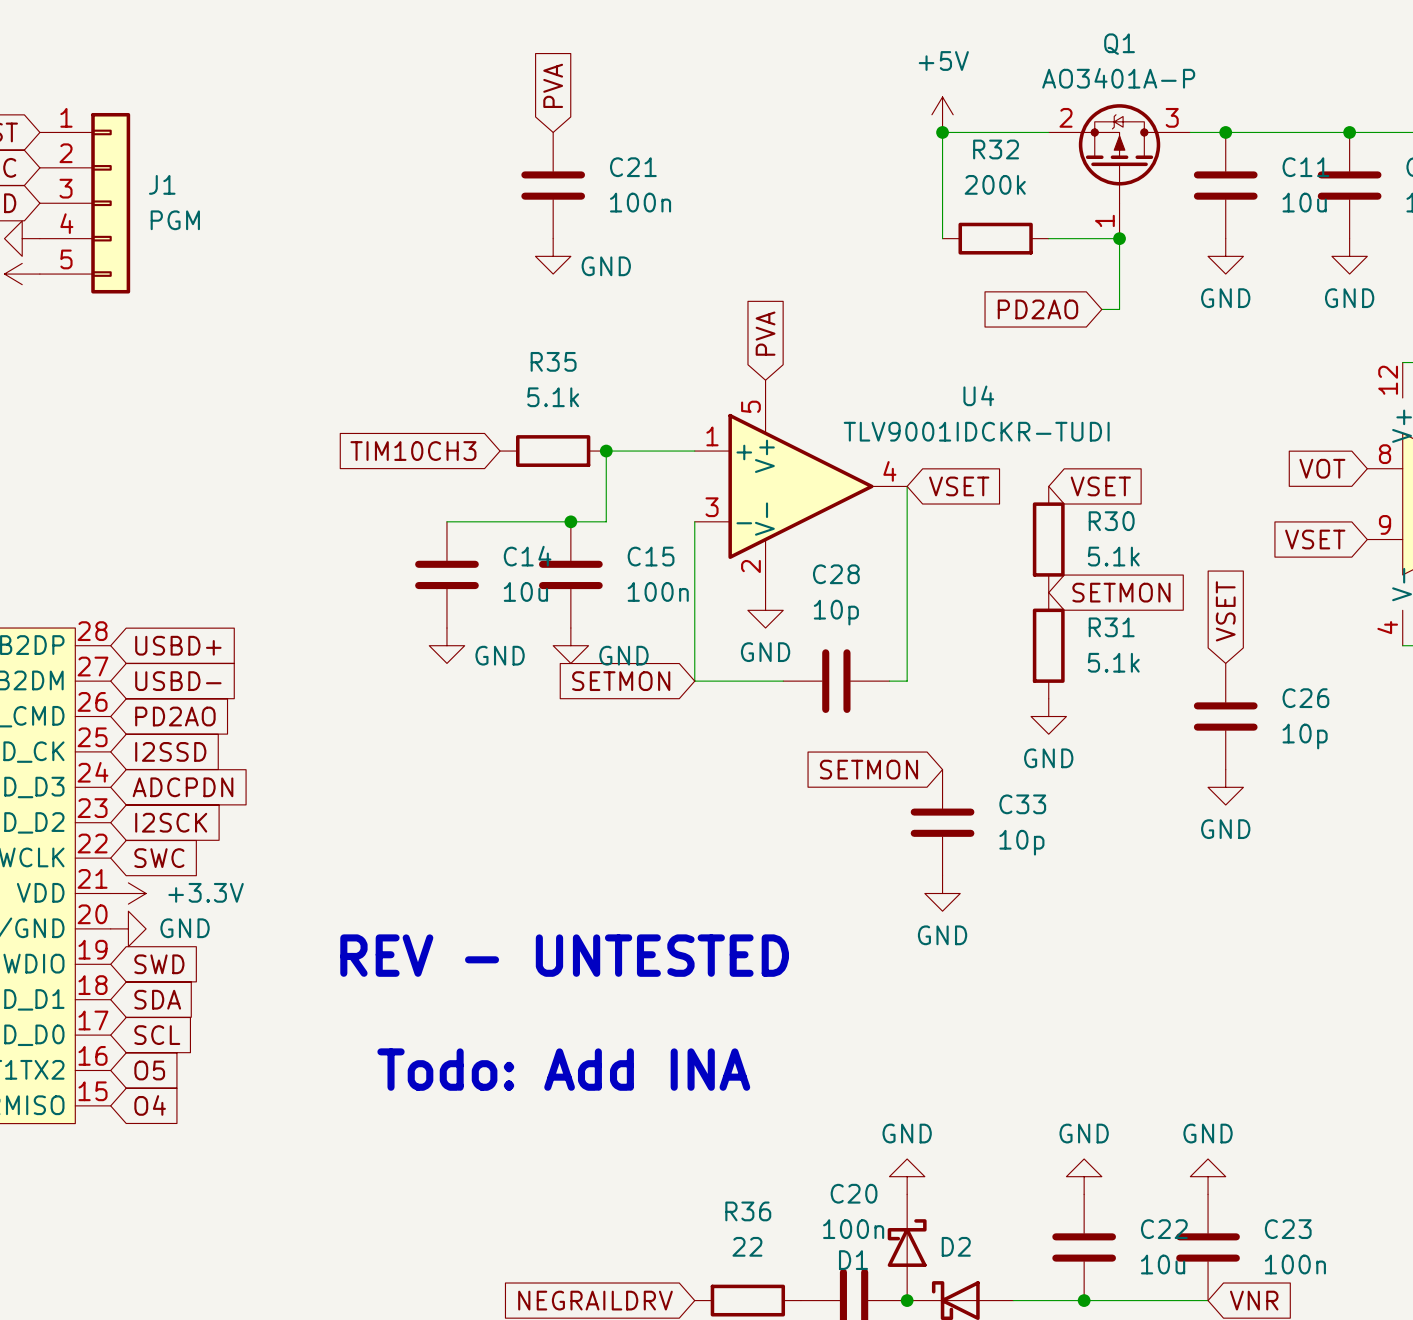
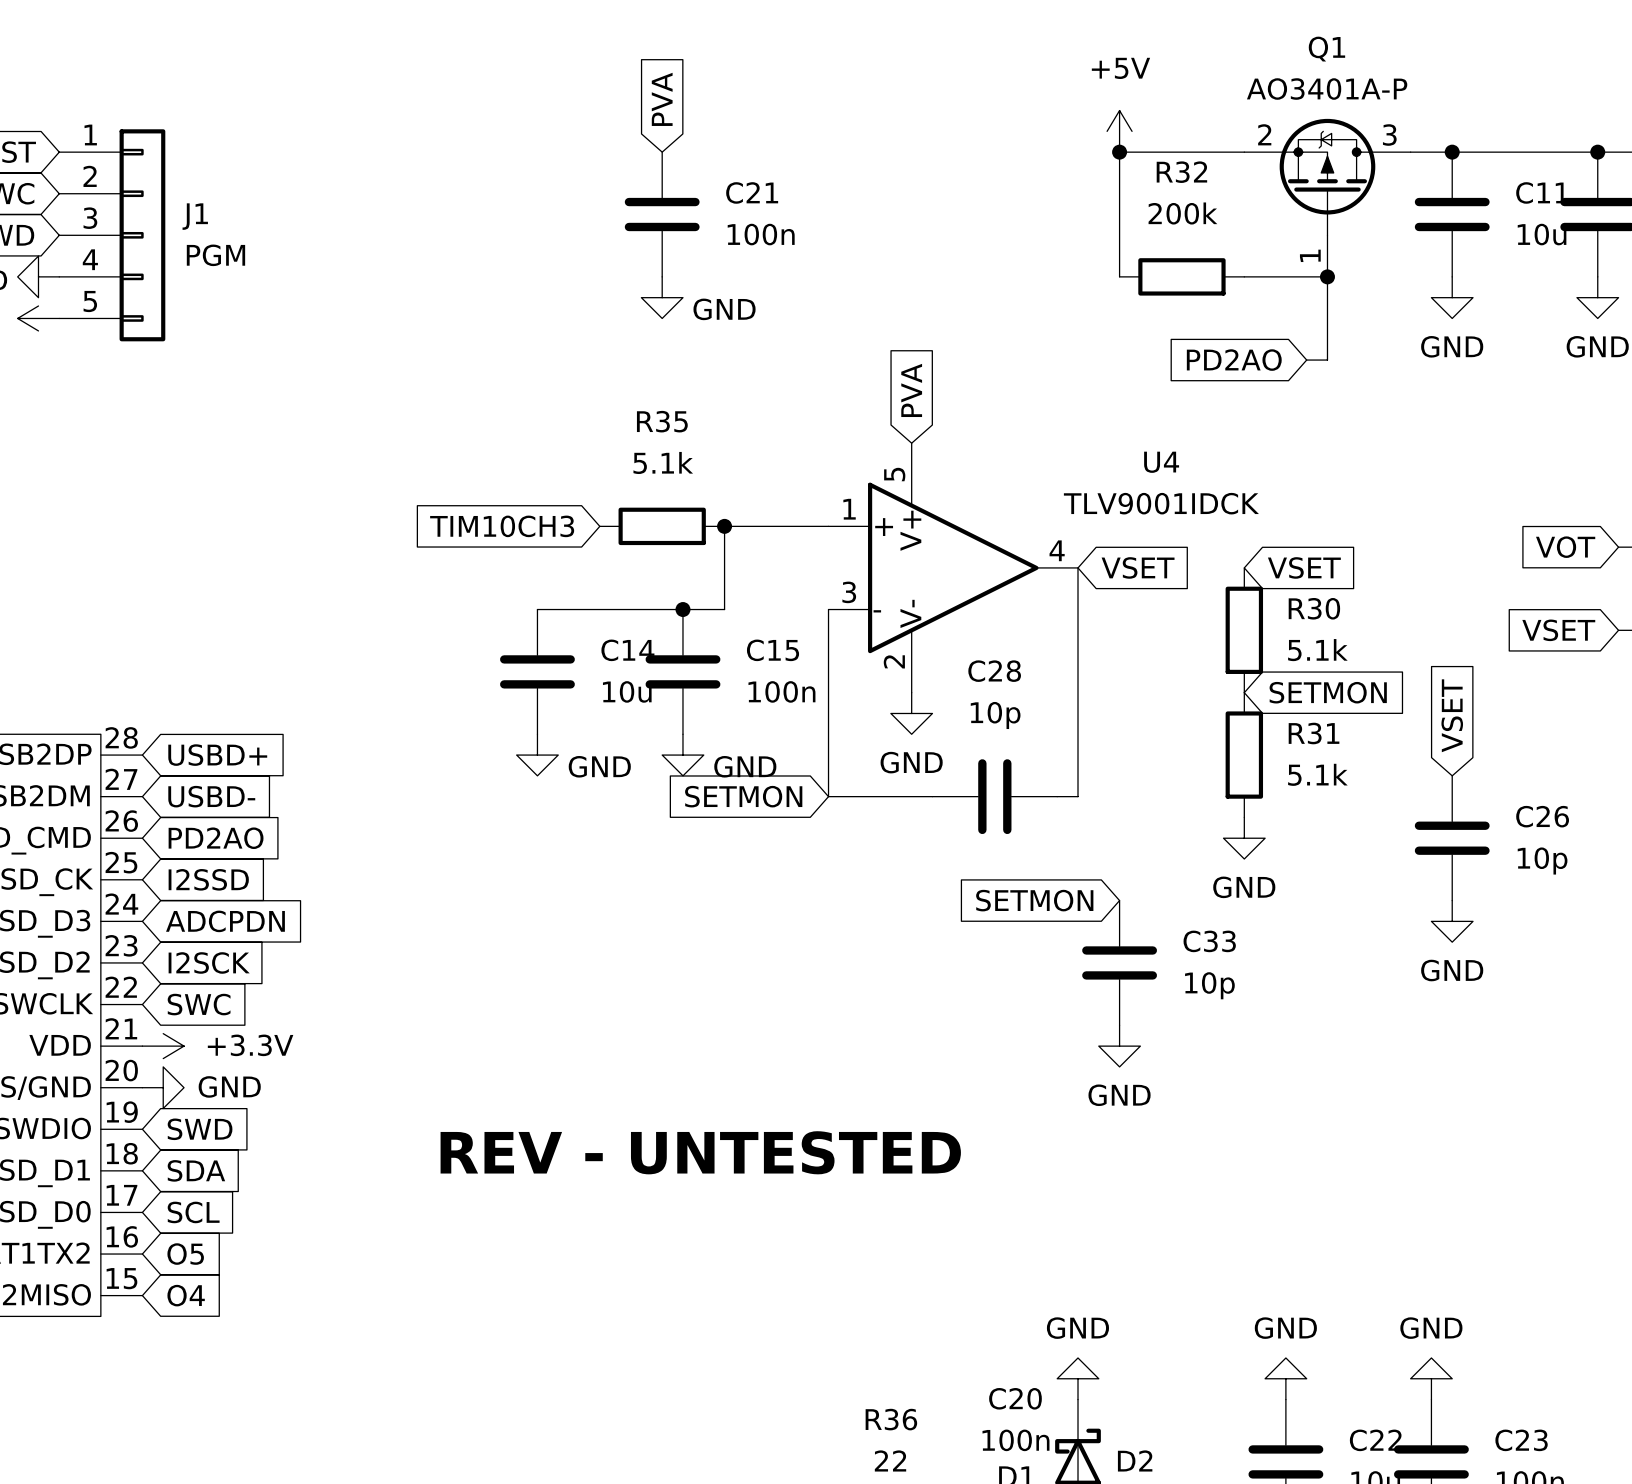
U4 value: TLV9001IDCKR-TUDI (976, 431) -> TLV9001IDCK (1161, 503)
text position: REV - UNTESTED (564, 955) -> REV - UNTESTED (700, 1152)
text: Todo: Add INA (563, 1069) -> none

